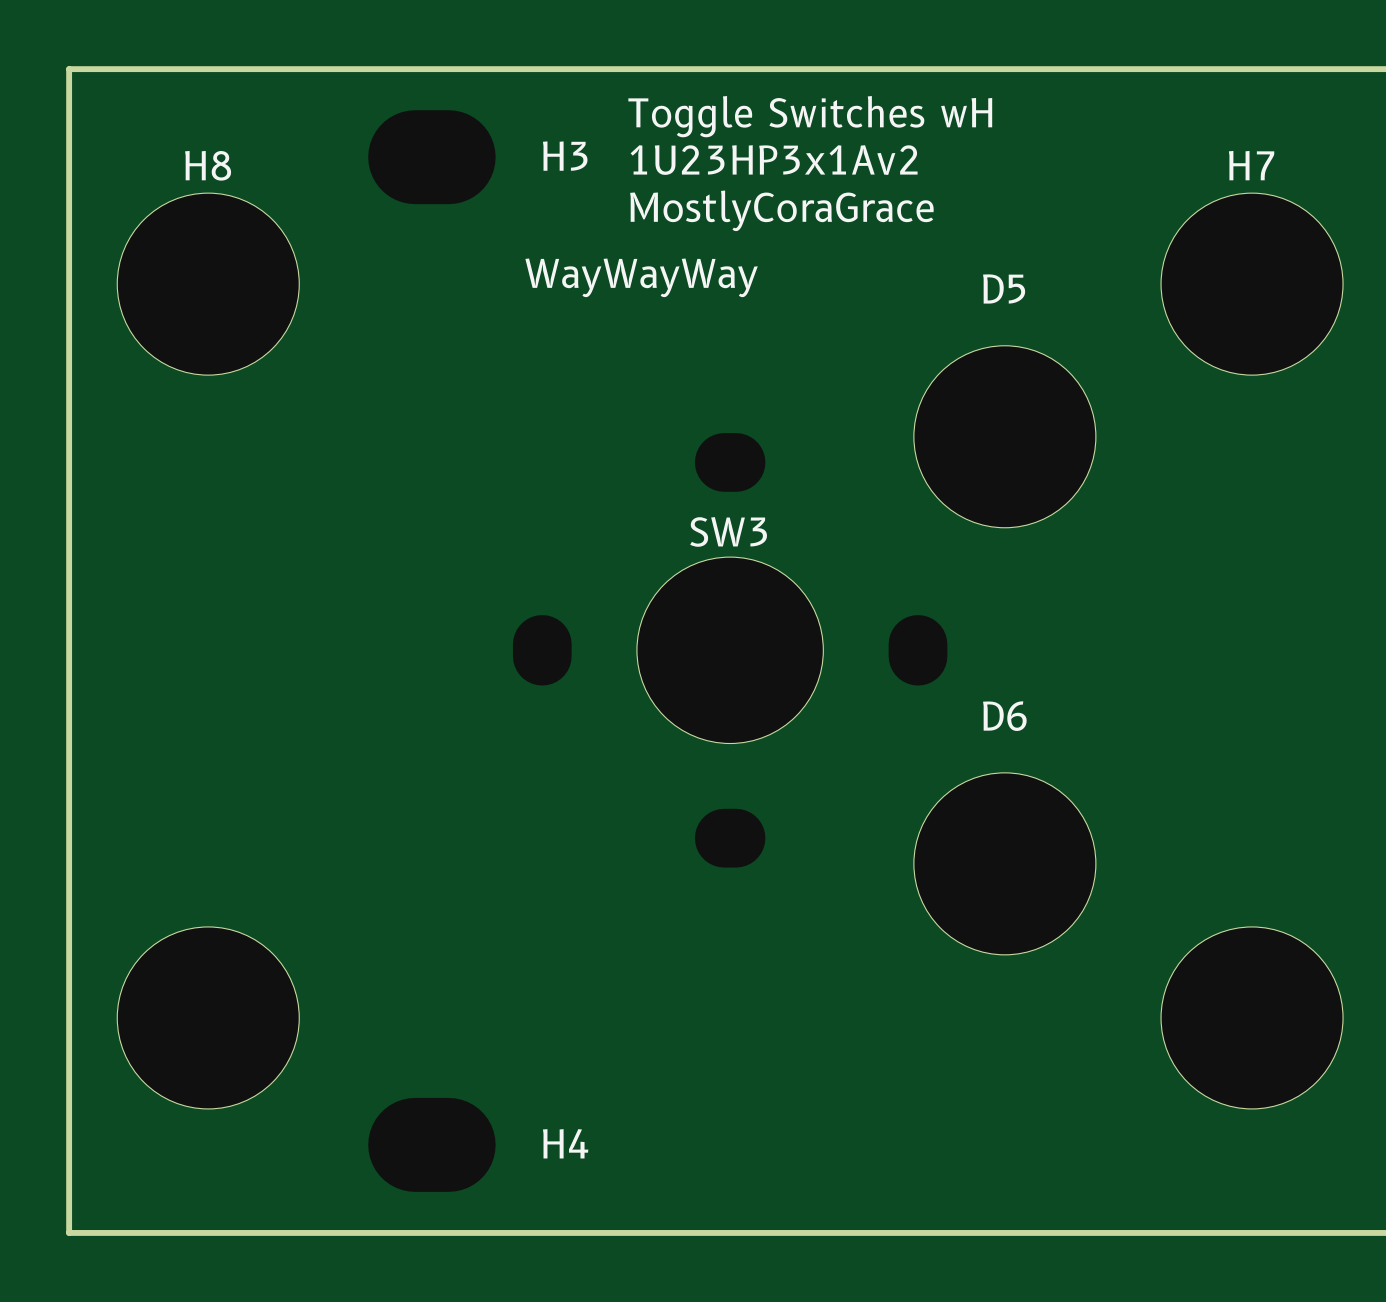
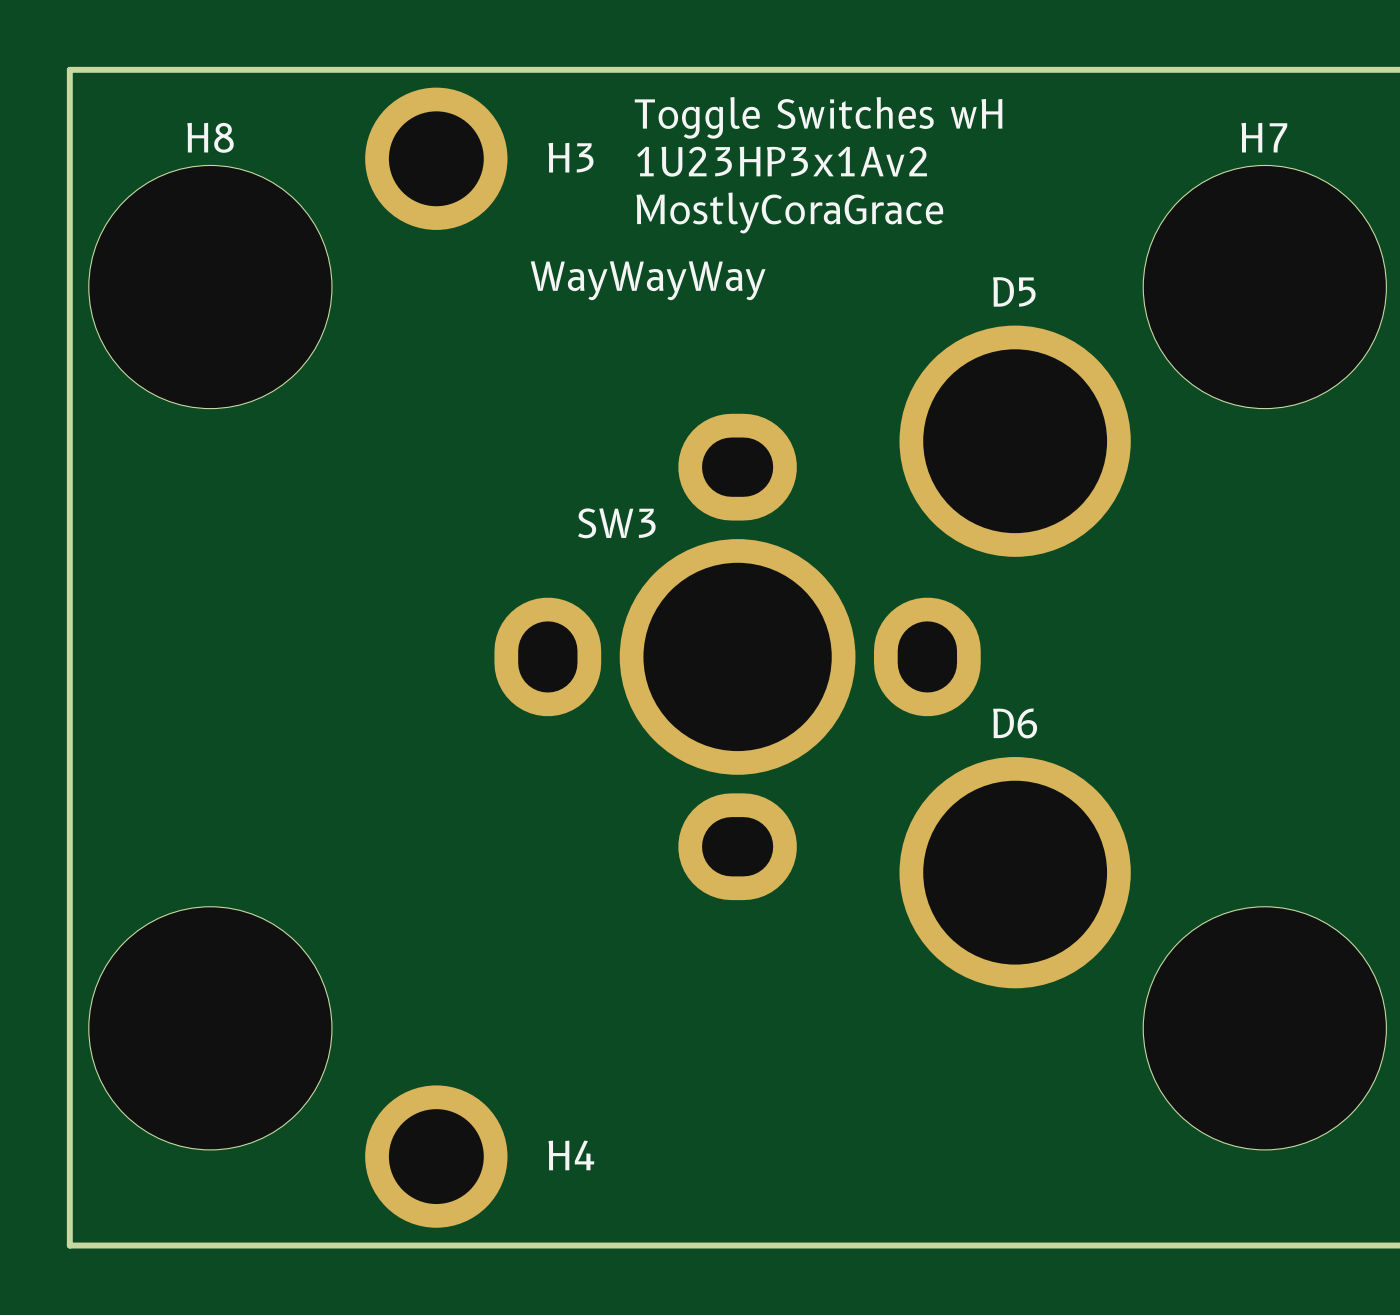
H3 footprint: [368, 110, 496, 205] -> [365, 87, 508, 230]
H8 footprint: [117, 193, 300, 1109] -> [88, 165, 332, 1150]
H7 footprint: [1161, 193, 1344, 1109] -> [1143, 165, 1387, 1150]
D5 footprint: [913, 345, 1096, 528] -> [899, 325, 1131, 557]
SW3 footprint: [512, 433, 948, 868] -> [494, 413, 981, 901]
SW3 name position: SW3 (728, 531) -> SW3 (616, 523)
D6 footprint: [913, 772, 1096, 955] -> [899, 757, 1131, 989]
H4 footprint: [368, 1097, 496, 1192] -> [365, 1085, 508, 1228]

